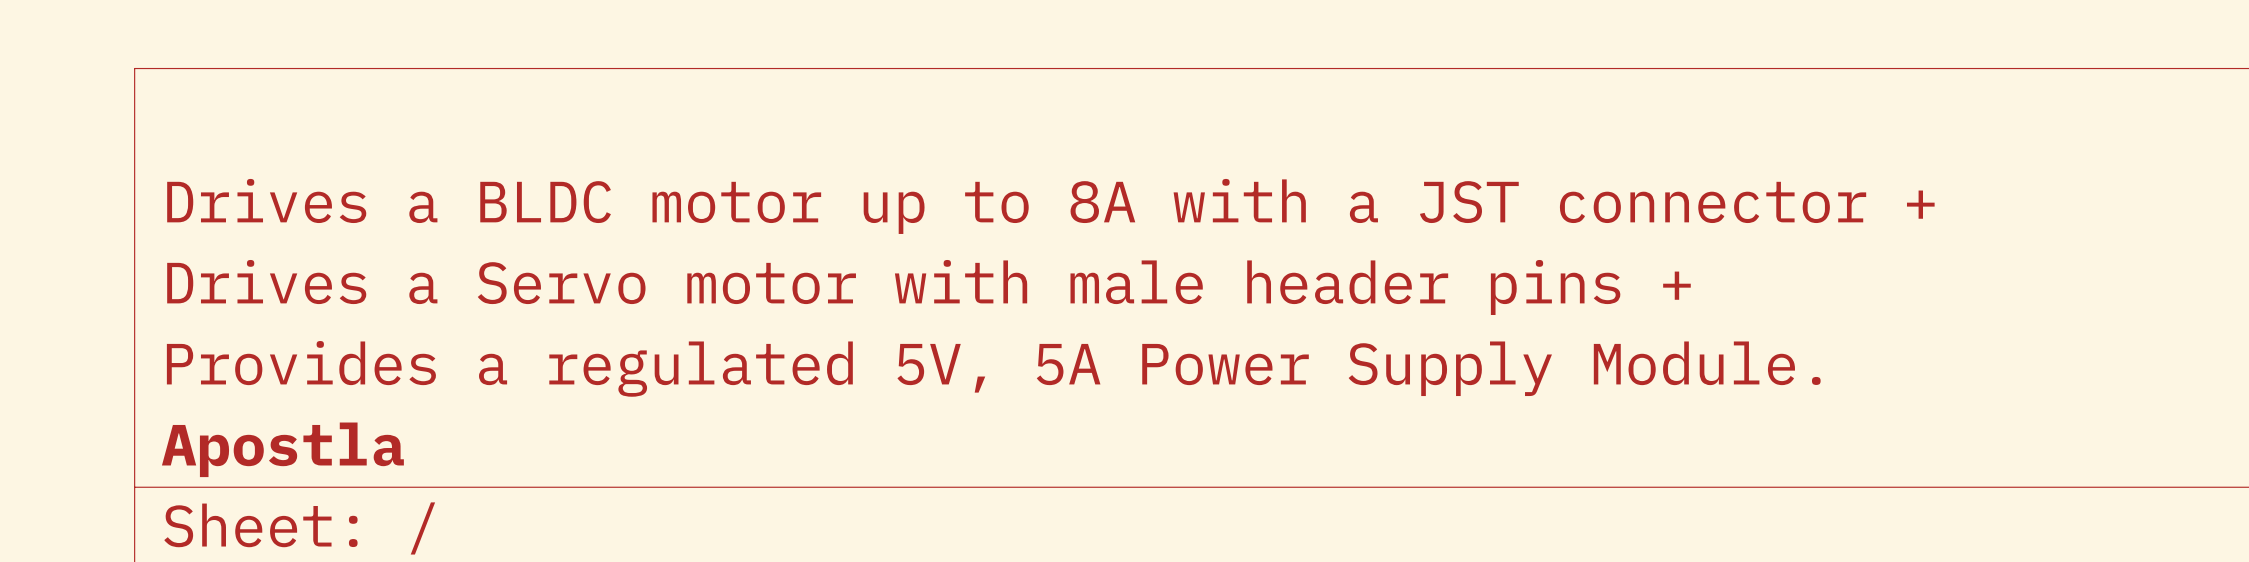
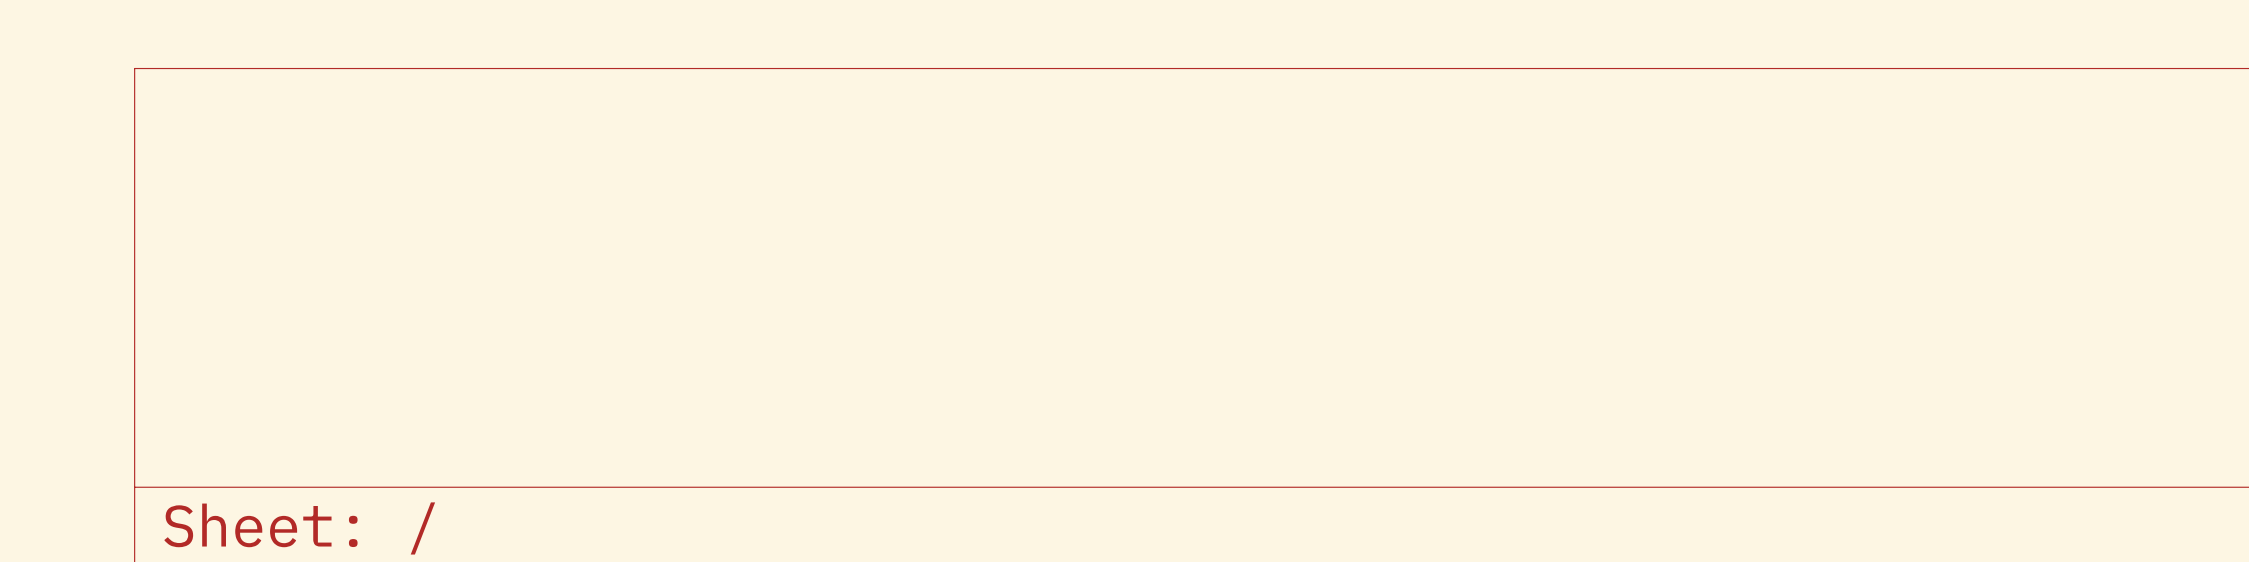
title block: Drives a BLDC motor up to 8A with a JST connector + (1050, 206) -> none
title block: Drives a Servo motor with male header pins + (928, 287) -> none
title block: Provides a regulated 5V, 5A Power Supply Module. (993, 368) -> none
title block: Apostla (282, 449) -> none

